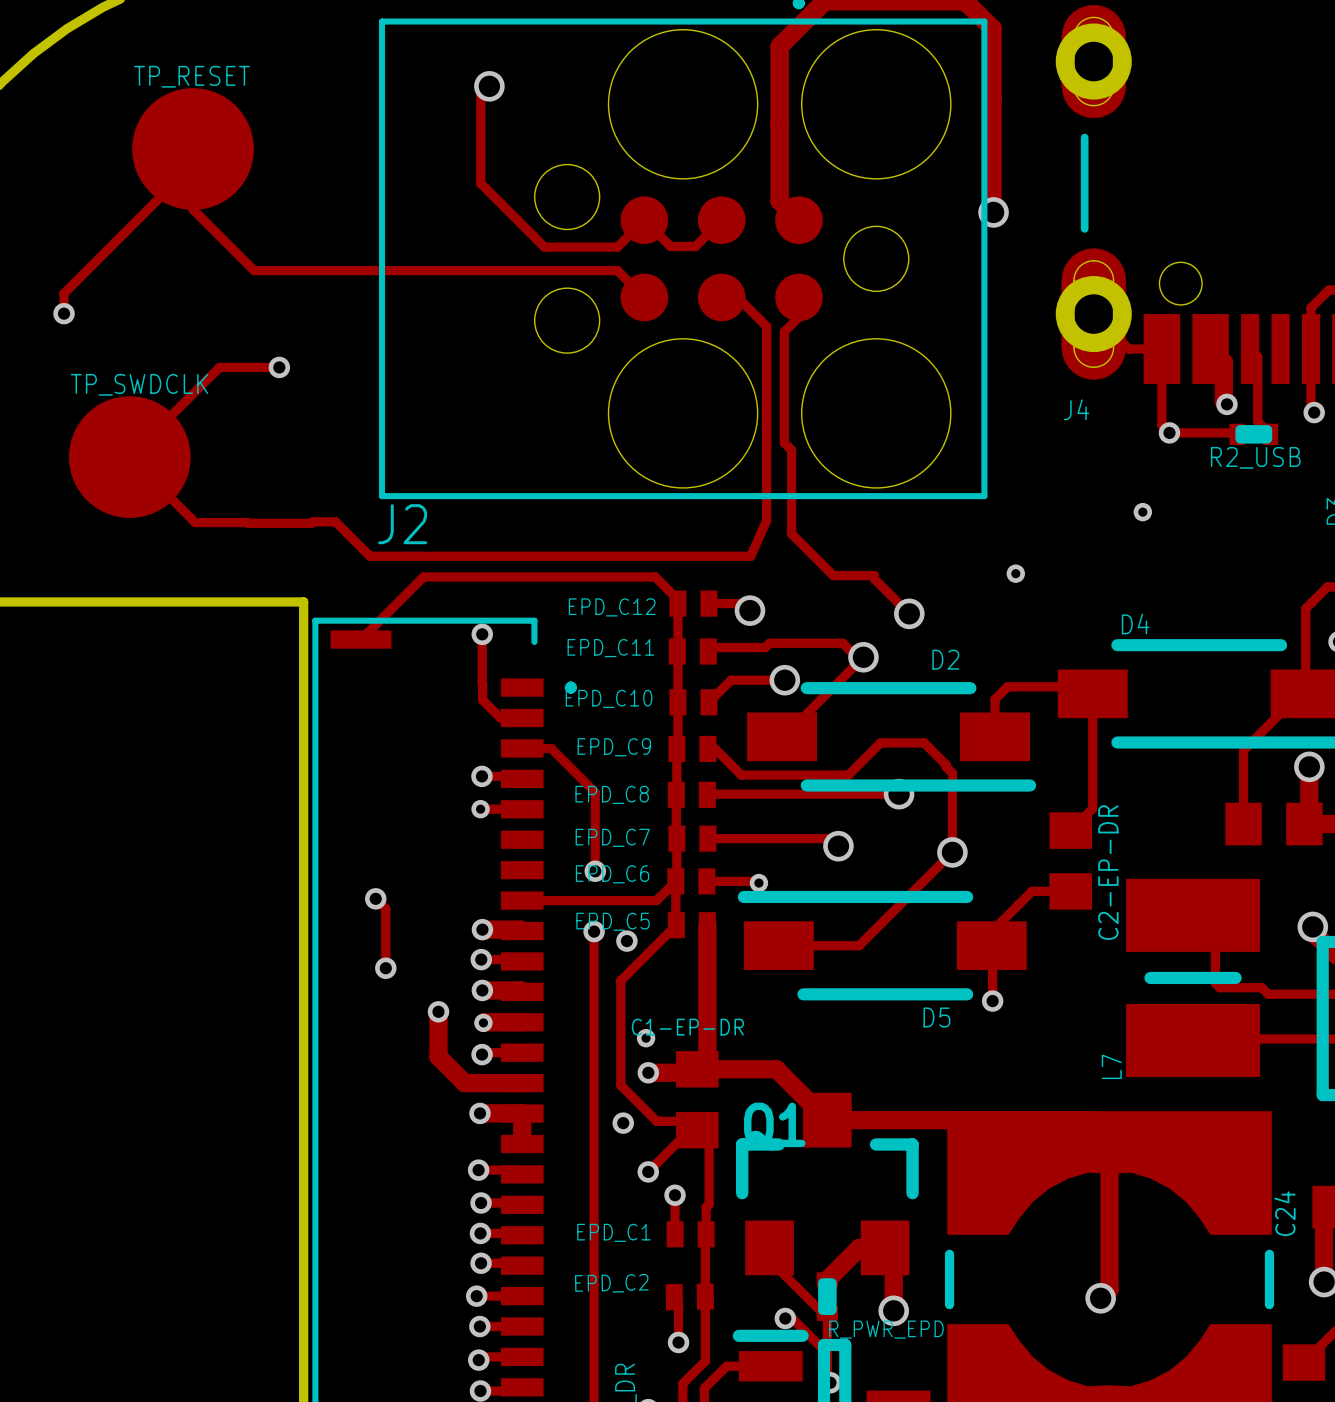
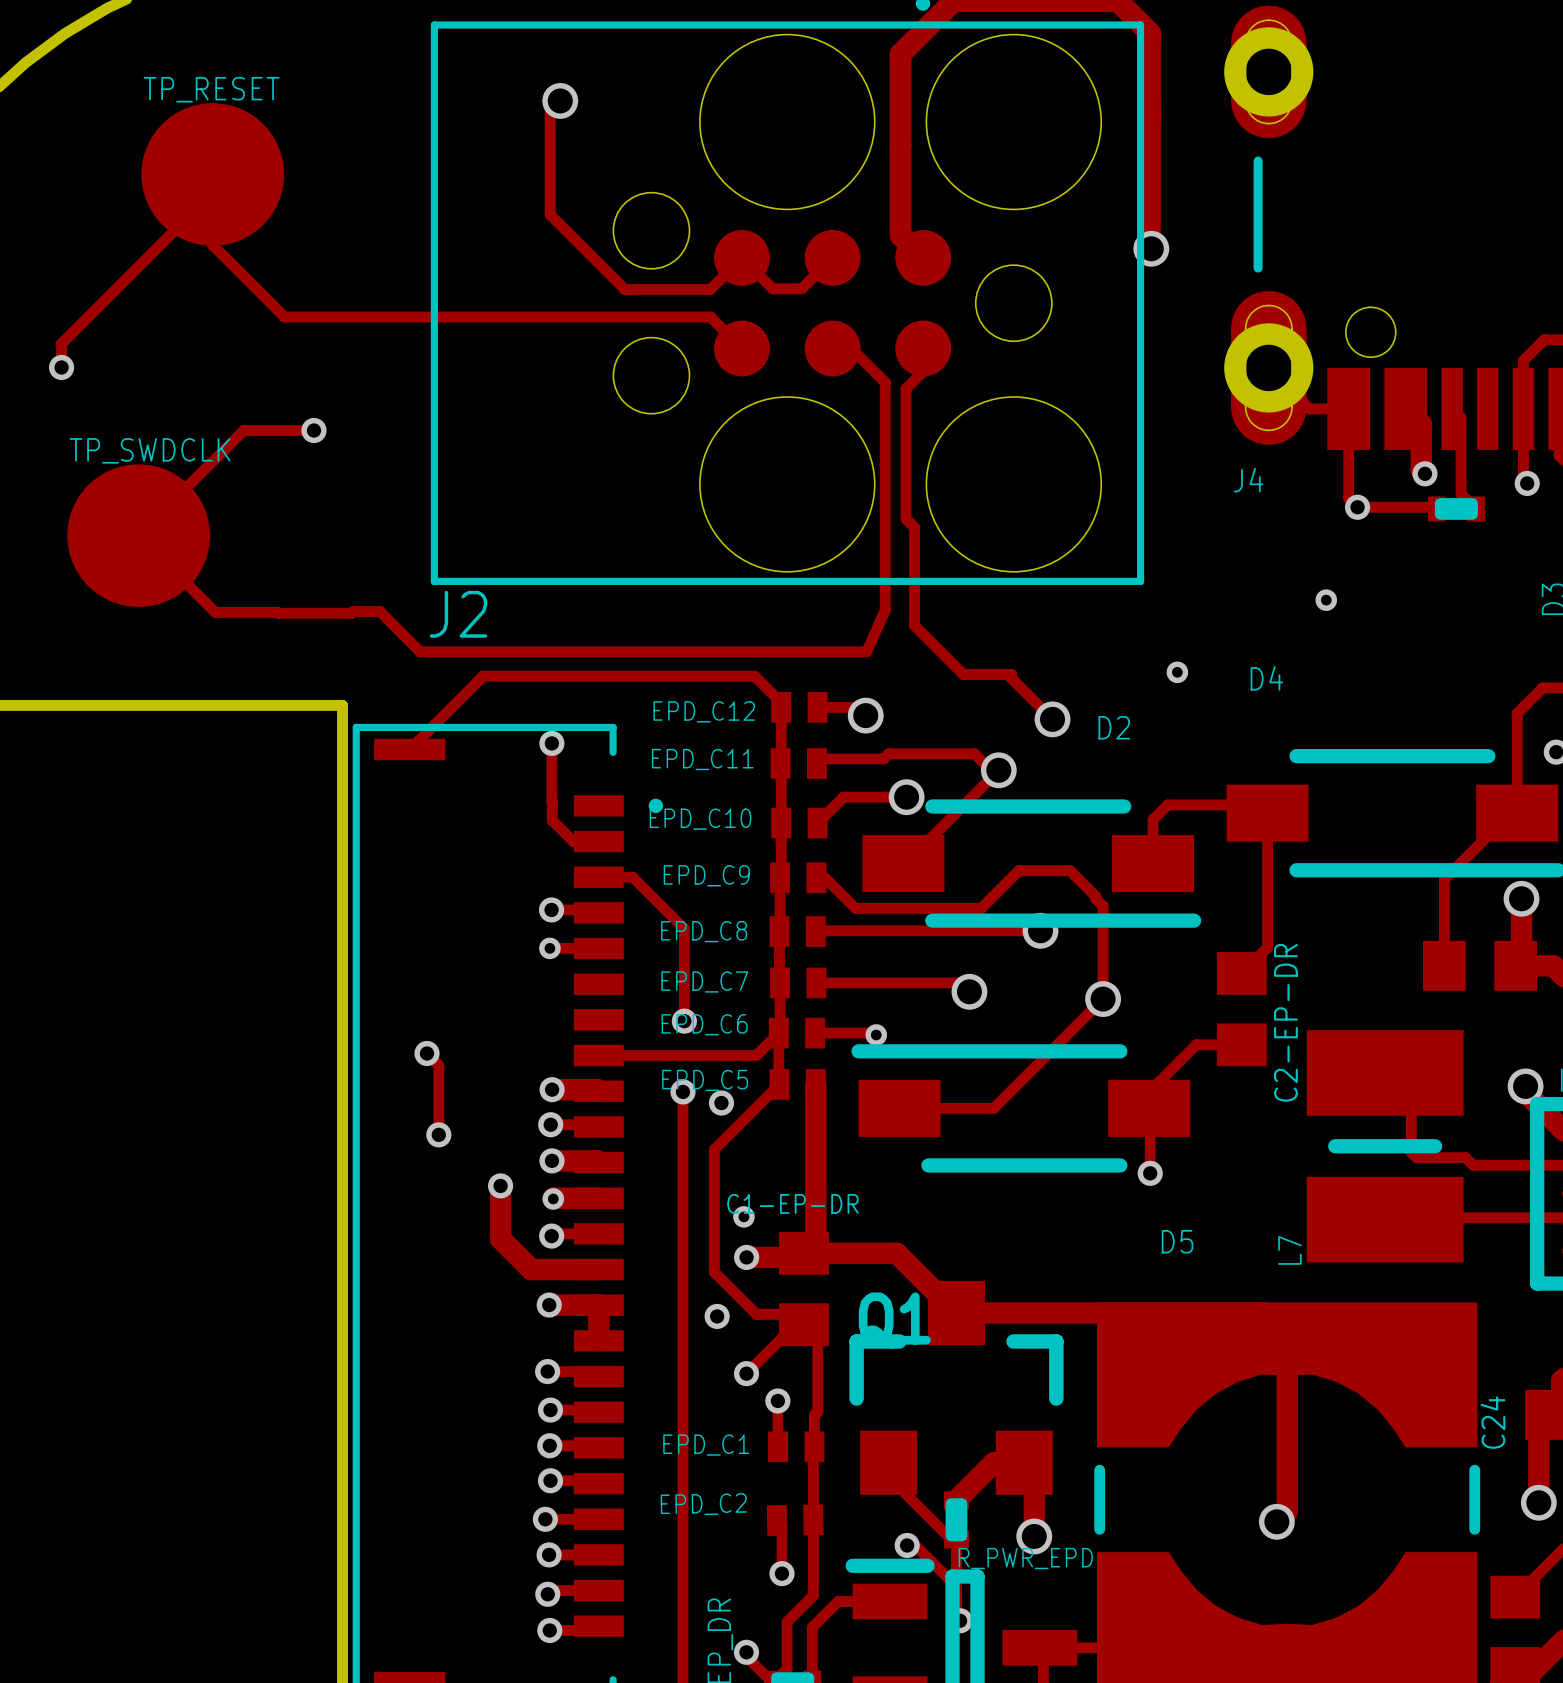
R2_USB name: R2_USB (1255, 457) -> none
D4 name position: D4 (1135, 623) -> D4 (1266, 678)
D2 name position: D2 (945, 659) -> D2 (1114, 727)
D5 name position: D5 (936, 1017) -> D5 (1177, 1241)

